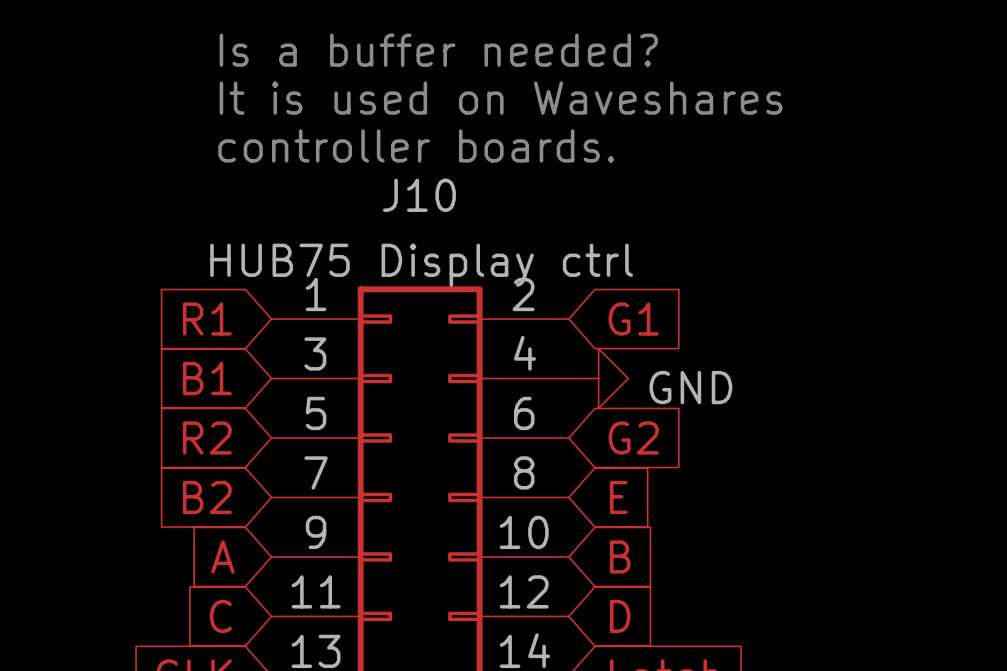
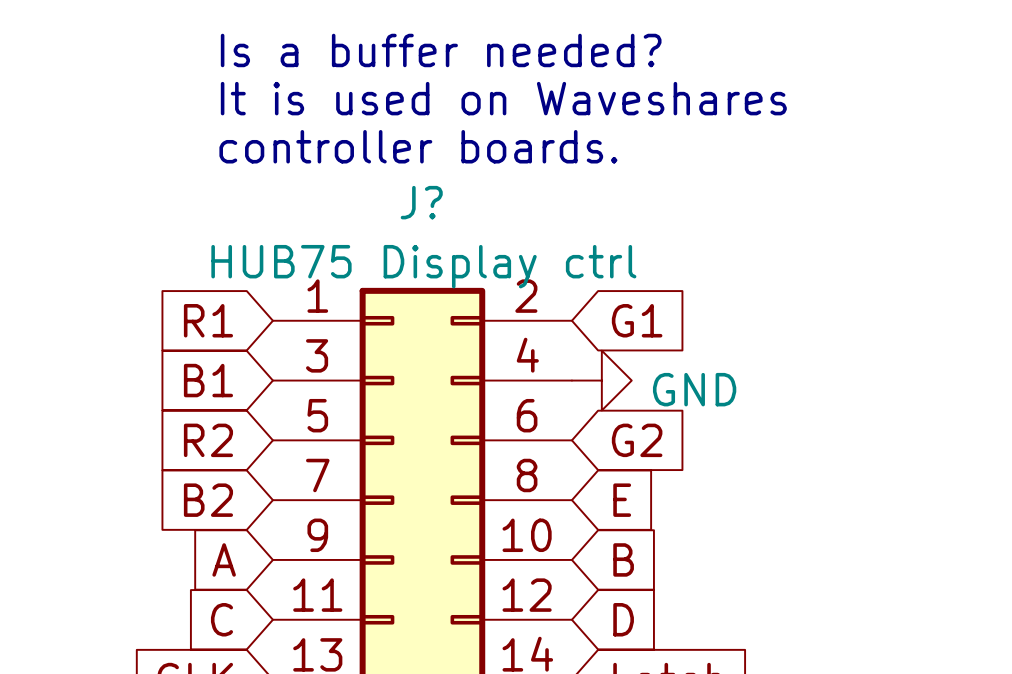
J10 name: J10 (419, 195) -> J? (421, 202)

